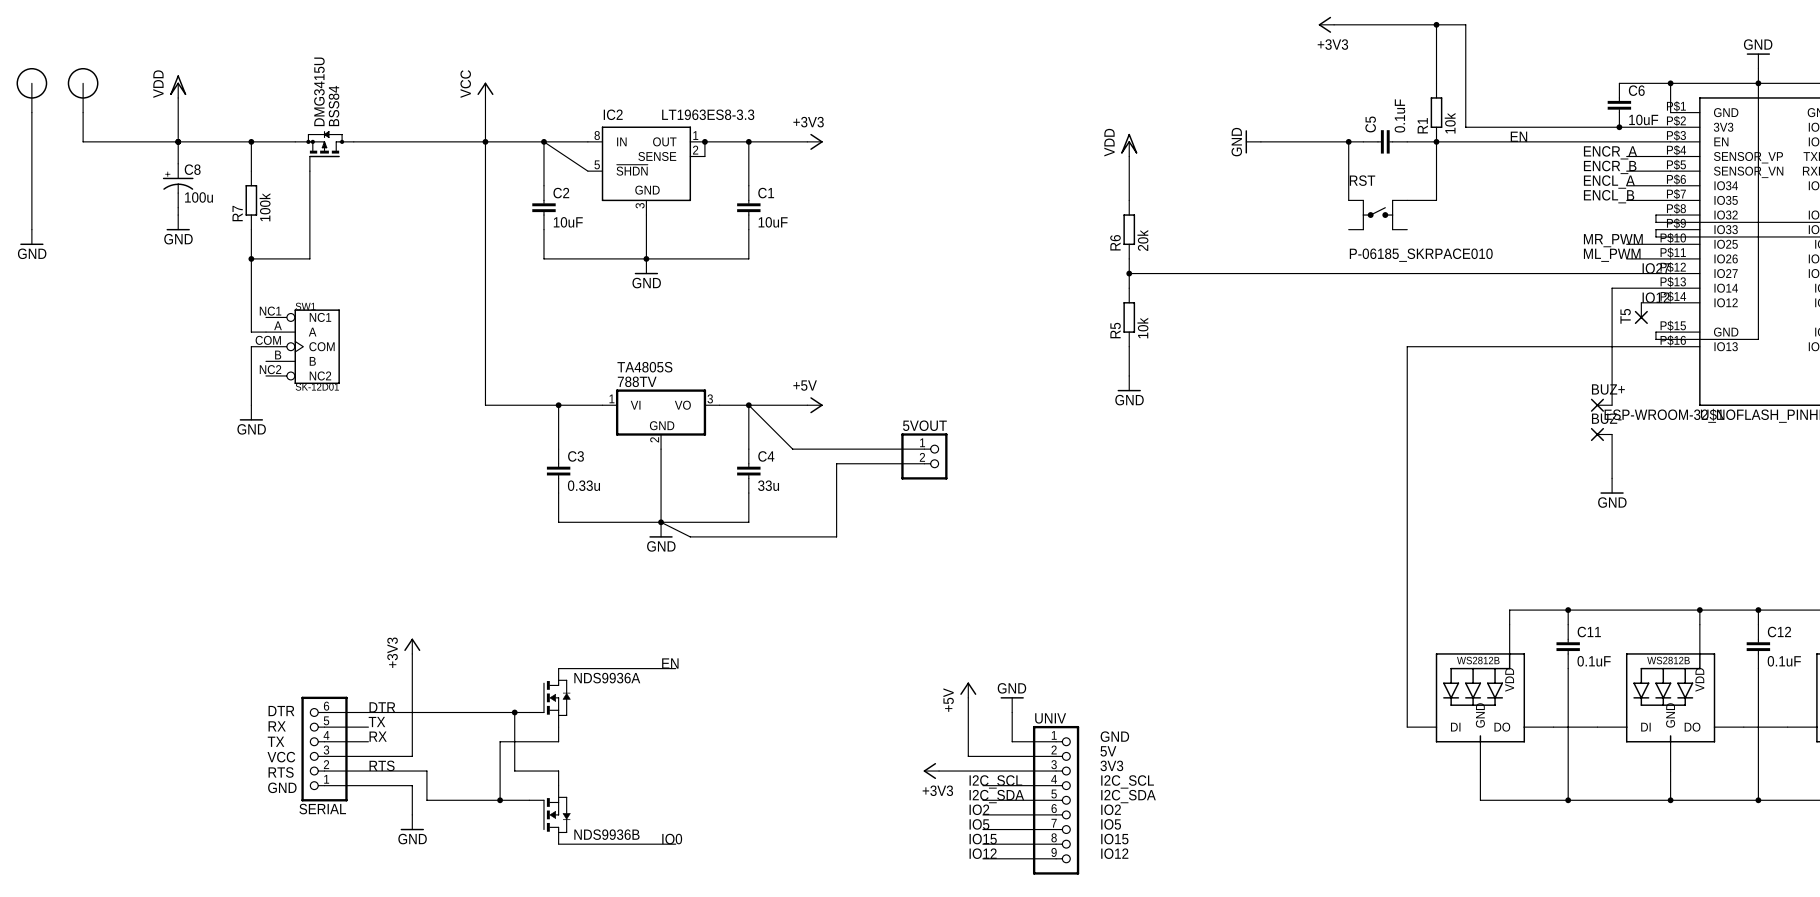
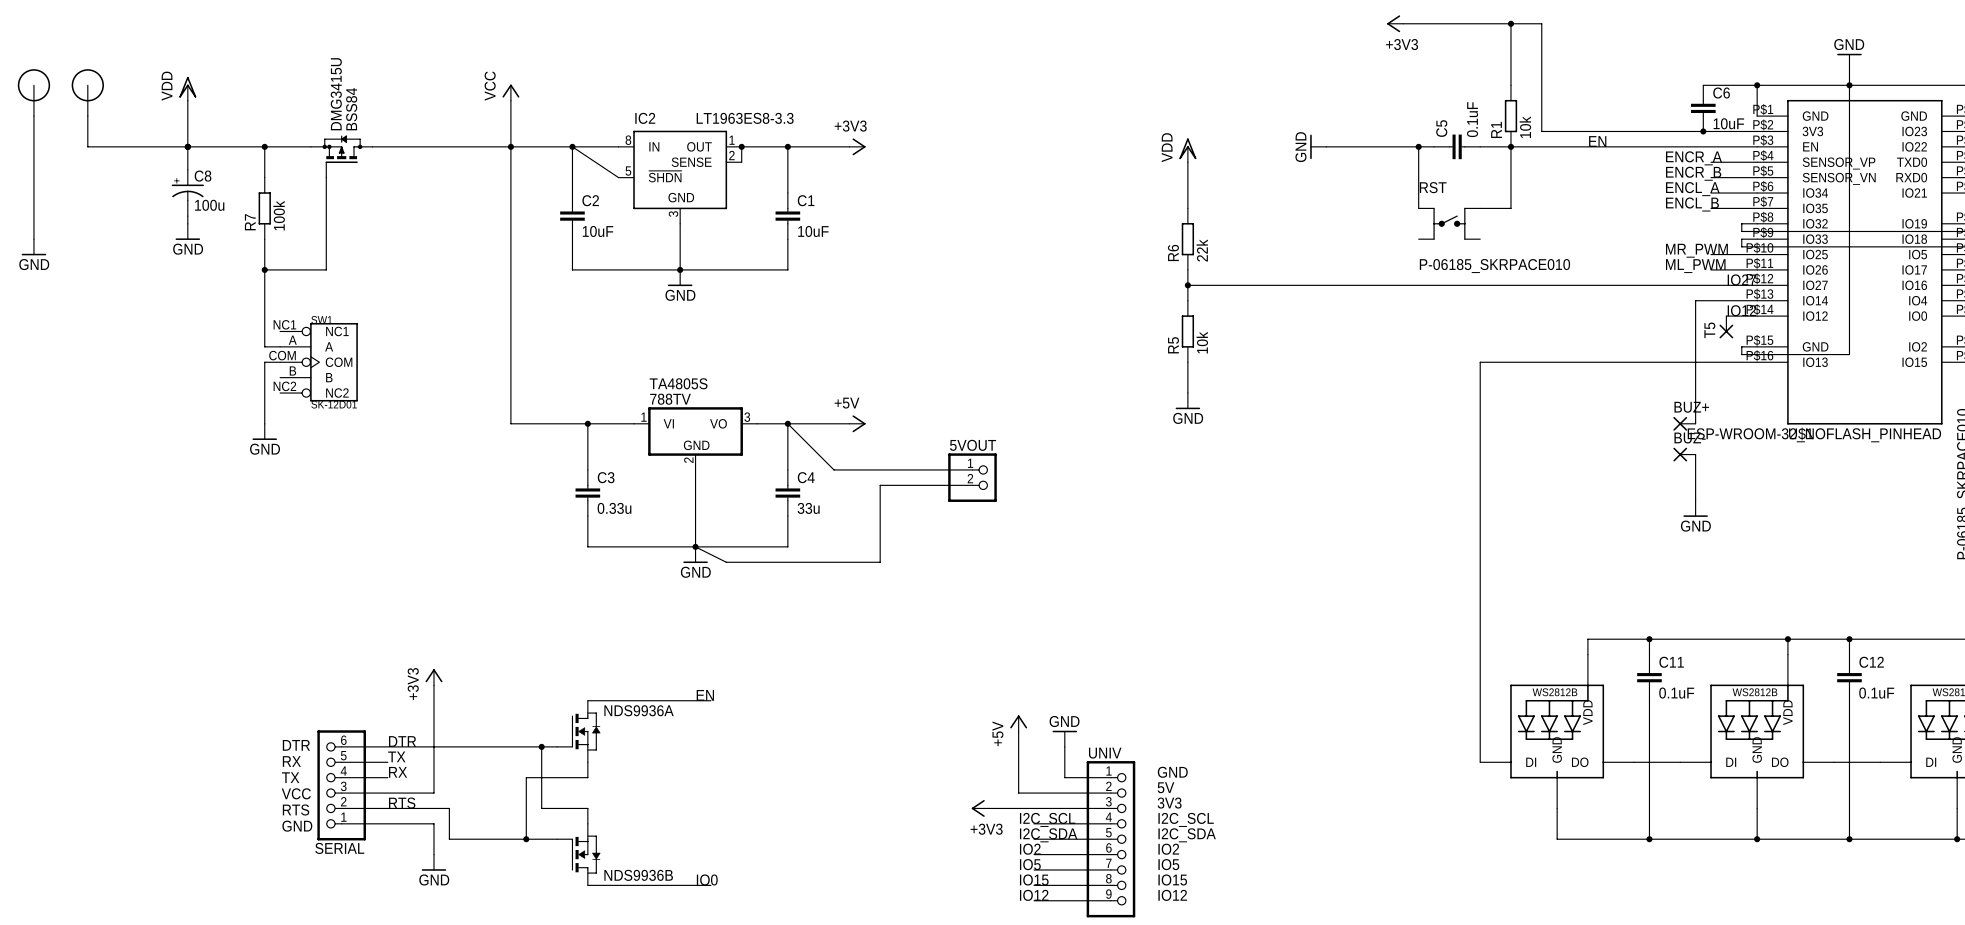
R6 value: 20k (1142, 240) -> 22k (1202, 250)

